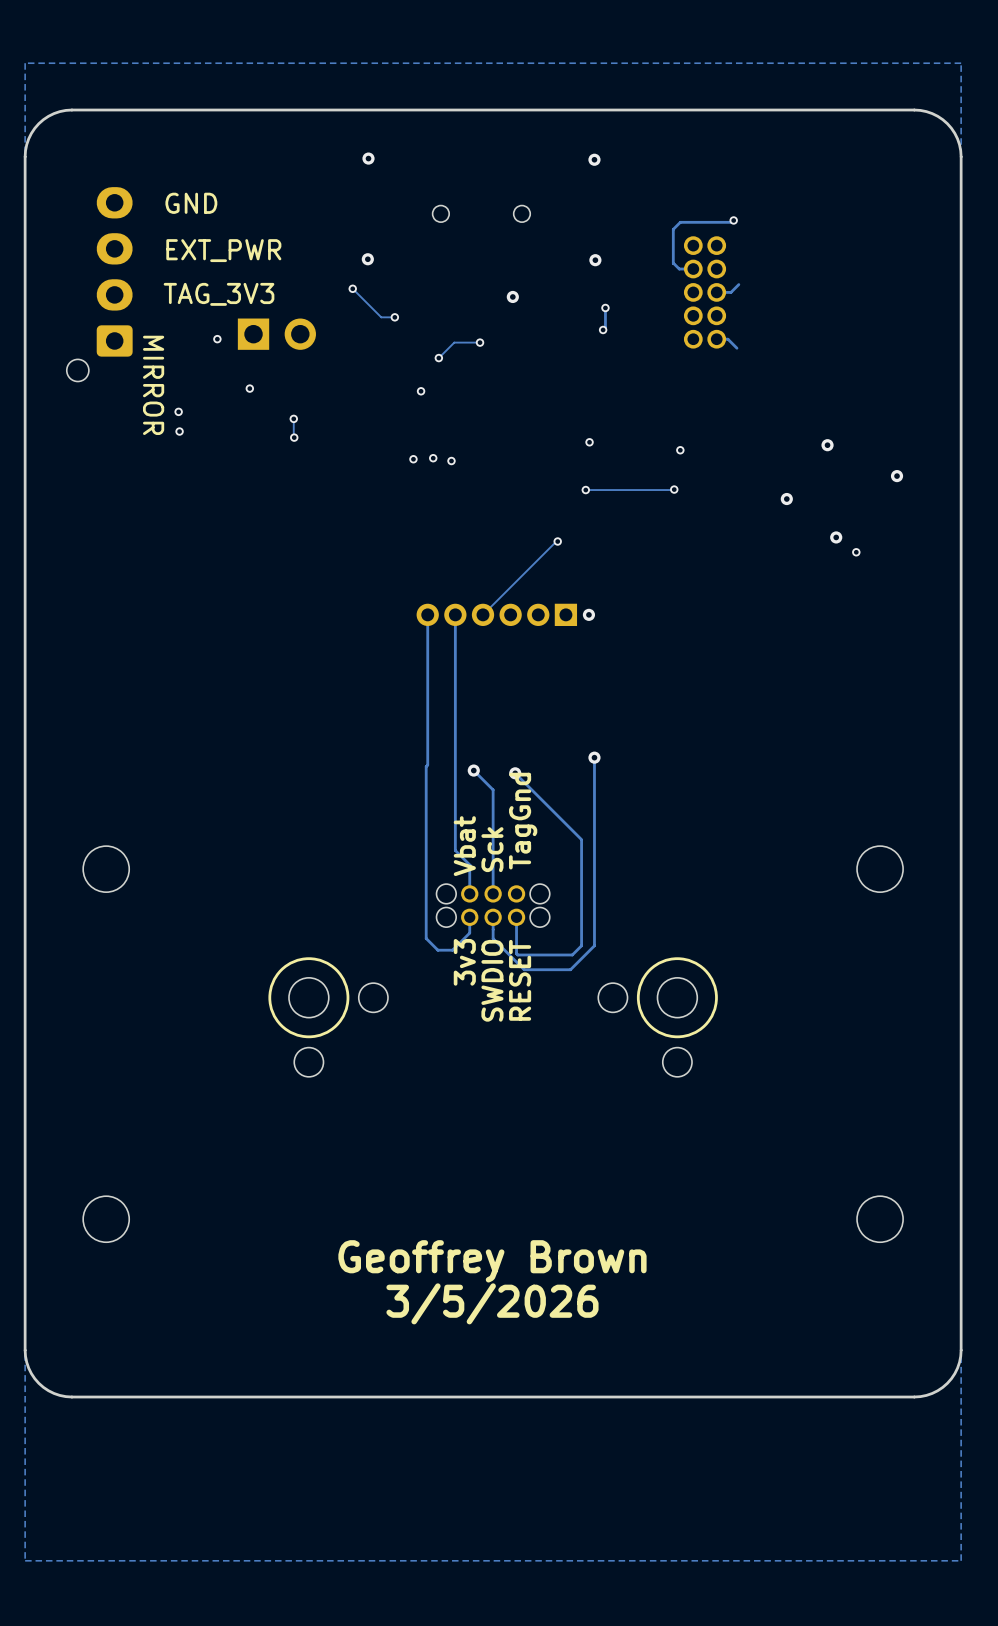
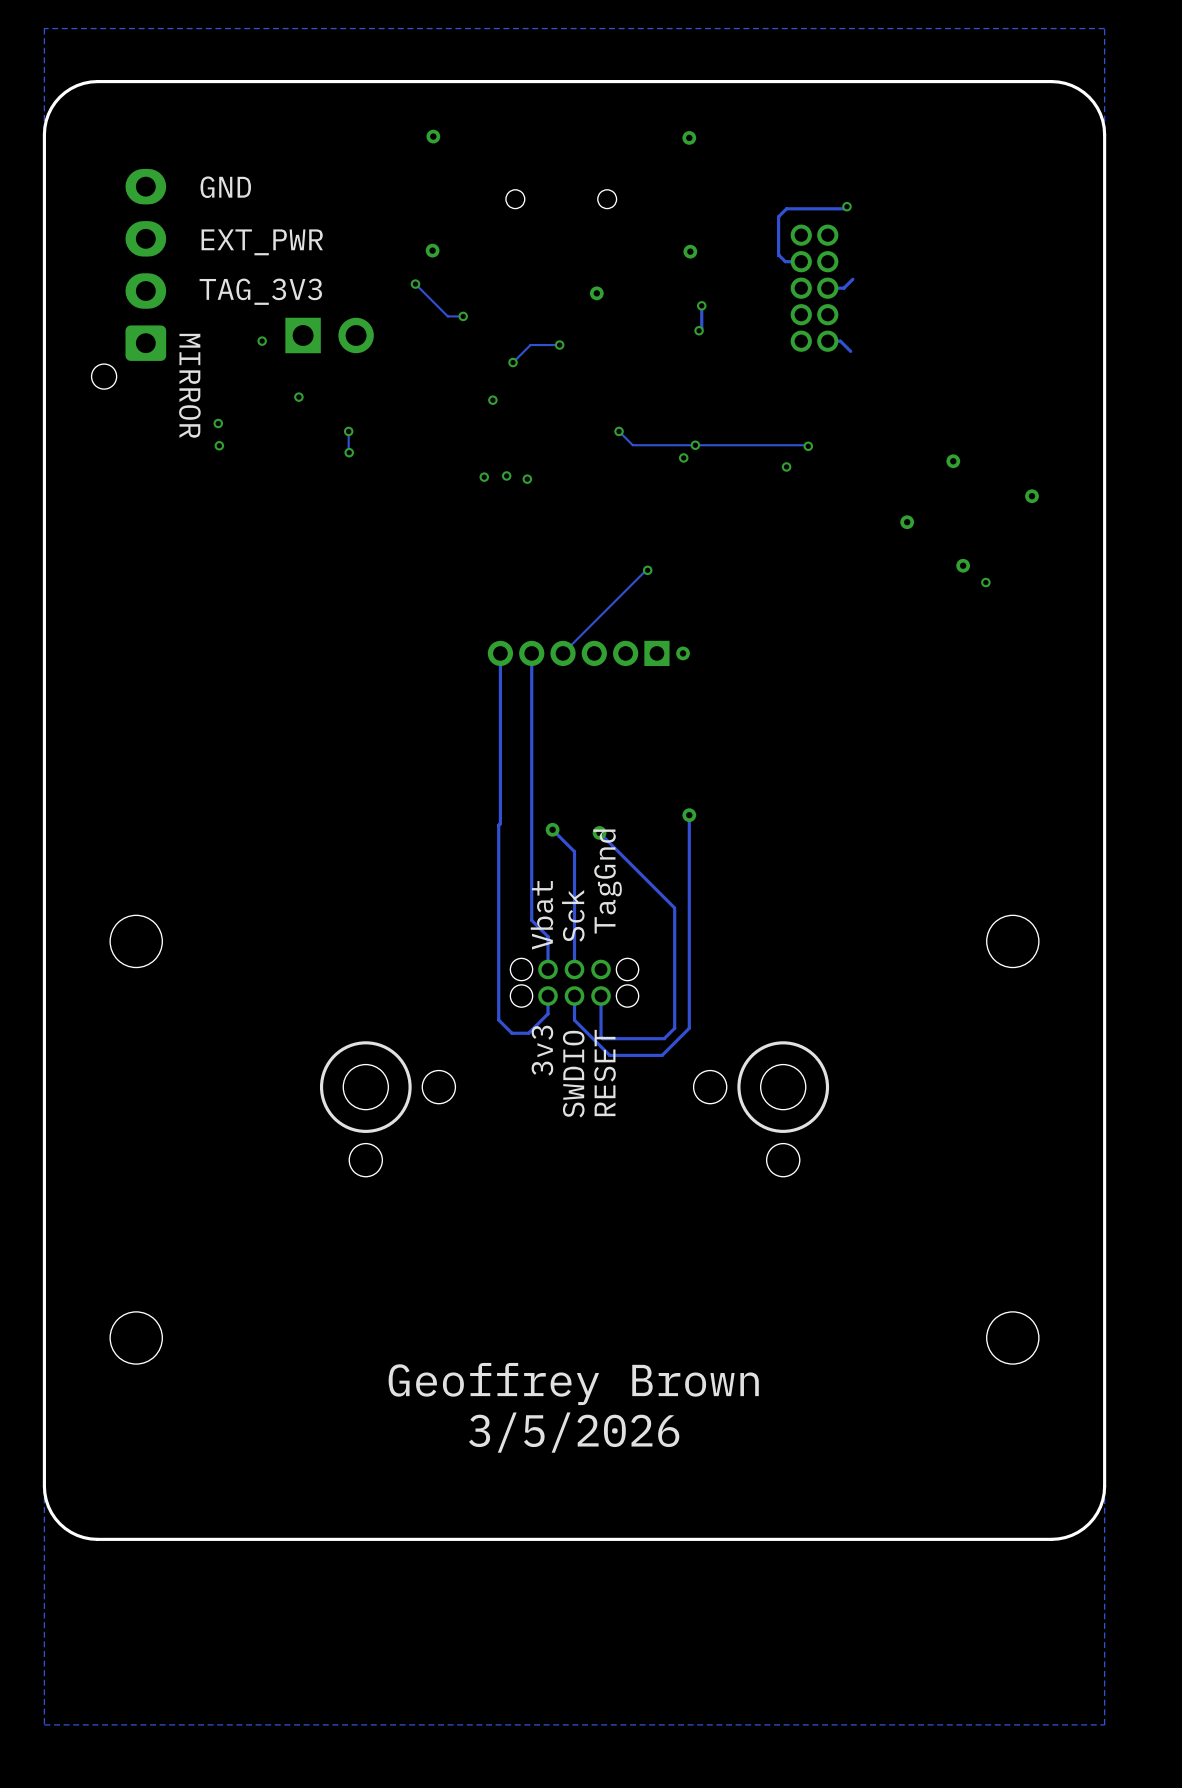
track: none -> (619, 431) (632, 445) (808, 446)
via: none -> (619, 431)
via: none -> (695, 445)
via: none -> (808, 446)
track: (674, 489) (585, 490) -> none
via: (674, 489) -> none
via: (585, 490) -> none

